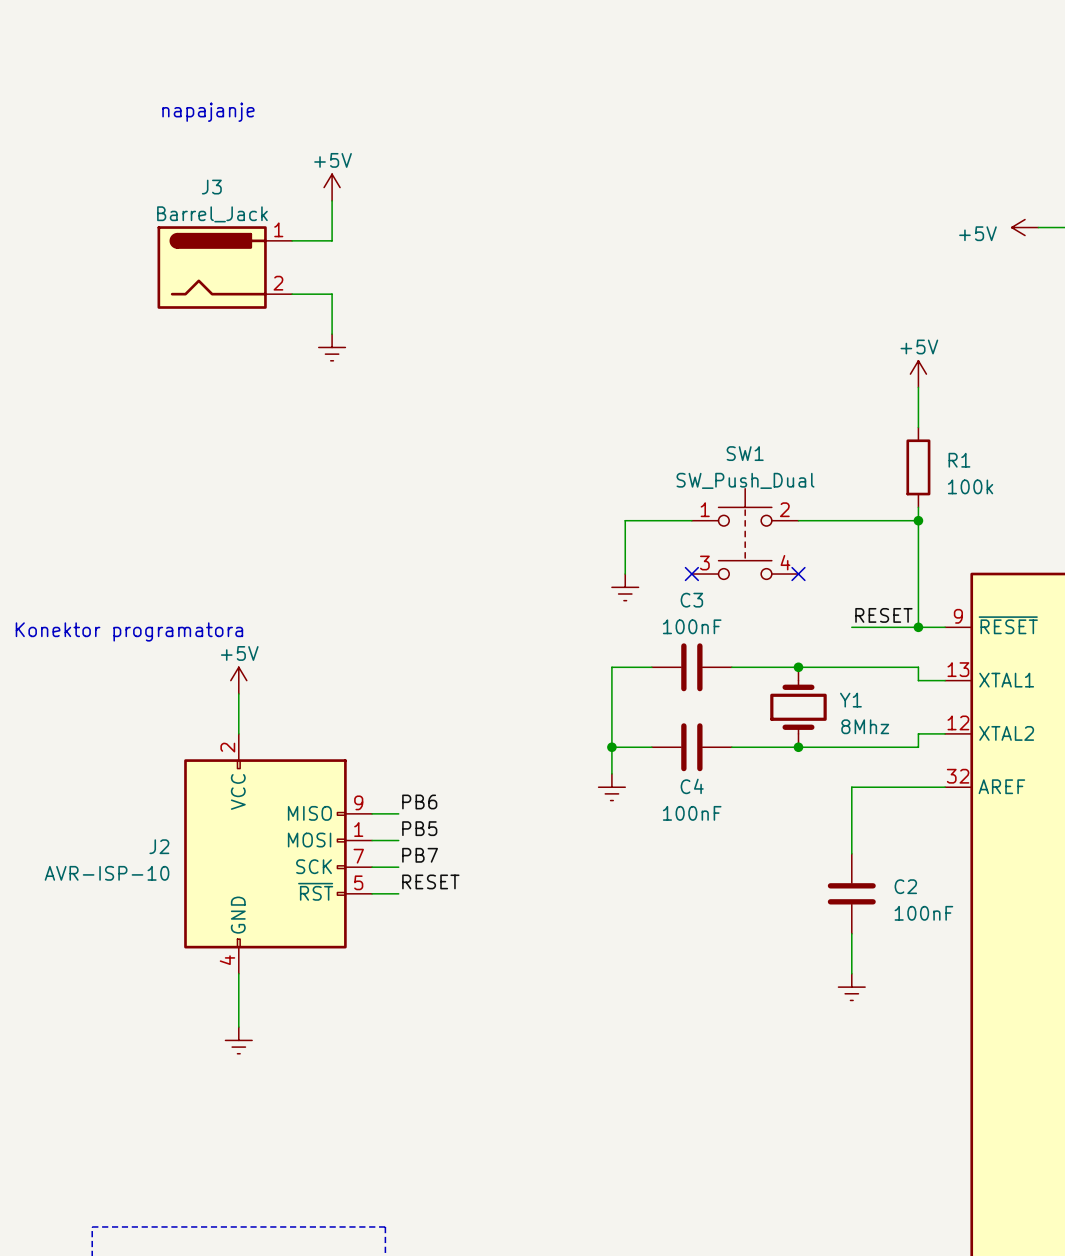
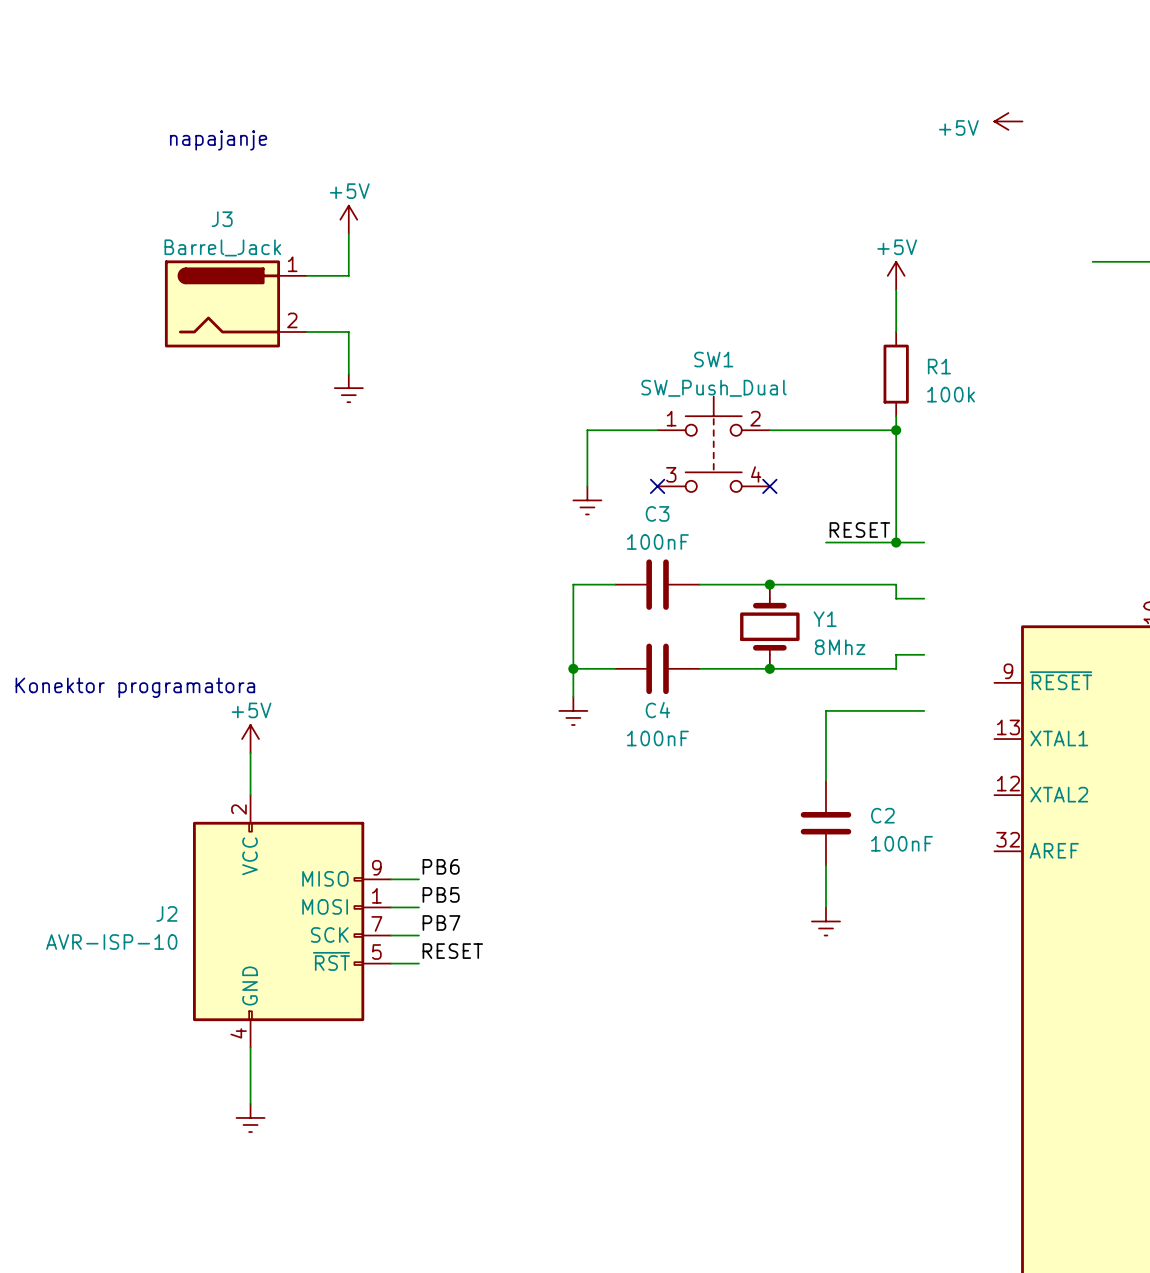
power symbol: none -> +5V (1008, 121)
power symbol: +5V (1025, 227) -> none
power symbol: none -> +5V (896, 275)
power symbol: +5V (918, 374) -> none
junction: none -> (896, 430)
wire: (918, 387) (918, 427) -> (896, 289) (896, 332)
no-connect mark: none -> (657, 486)
no-connect mark: none -> (769, 486)
power symbol: none -> (587, 500)
R1 position: (918, 467) -> (896, 374)
junction: none -> (896, 542)
wire: (918, 507) (918, 627) -> (896, 416) (896, 542)
wire: (691, 520) (625, 520) (625, 574) -> (657, 430) (587, 430) (587, 486)
wire: (798, 520) (918, 520) -> (769, 430) (896, 430)
junction: (918, 520) -> none
junction: none -> (769, 584)
SW1 position: (745, 534) -> (713, 444)
no-connect mark: (691, 574) -> none
no-connect mark: (798, 574) -> none
power symbol: (625, 587) -> none
junction: none -> (573, 668)
junction: none -> (769, 668)
label position: RESET (883, 615) -> RESET (859, 530)
wire: (851, 627) (945, 627) -> (825, 542) (924, 542)
junction: (918, 627) -> none
power symbol: none -> (573, 710)
wire: (651, 667) (611, 667) (611, 773) -> (615, 584) (573, 584) (573, 696)
C3 position: (691, 667) -> (657, 584)
wire: (731, 667) (918, 667) (918, 680) (945, 680) -> (699, 584) (896, 584) (896, 598) (924, 598)
junction: (798, 667) -> none
Y1 position: (798, 707) -> (769, 626)
wire: (945, 733) (918, 733) (918, 747) (731, 747) -> (924, 654) (896, 654) (896, 668) (699, 668)
wire: (611, 747) (651, 747) -> (573, 668) (615, 668)
junction: (611, 747) -> none
C4 position: (691, 747) -> (657, 668)
junction: (798, 747) -> none
power symbol: (611, 787) -> none
wire: (945, 787) (851, 787) (851, 853) -> (924, 710) (825, 710) (825, 781)
power symbol: none -> (825, 921)
C2 position: (851, 893) -> (825, 823)
wire: (851, 933) (851, 973) -> (825, 865) (825, 907)
power symbol: (851, 987) -> none

